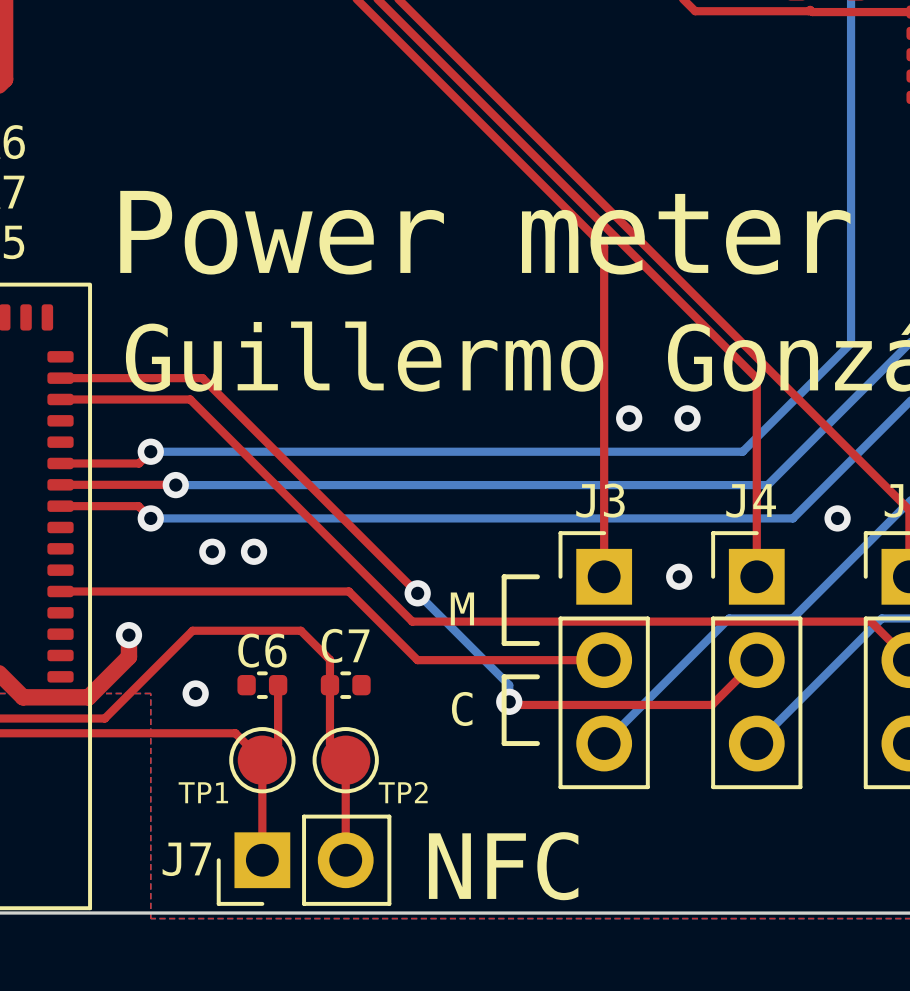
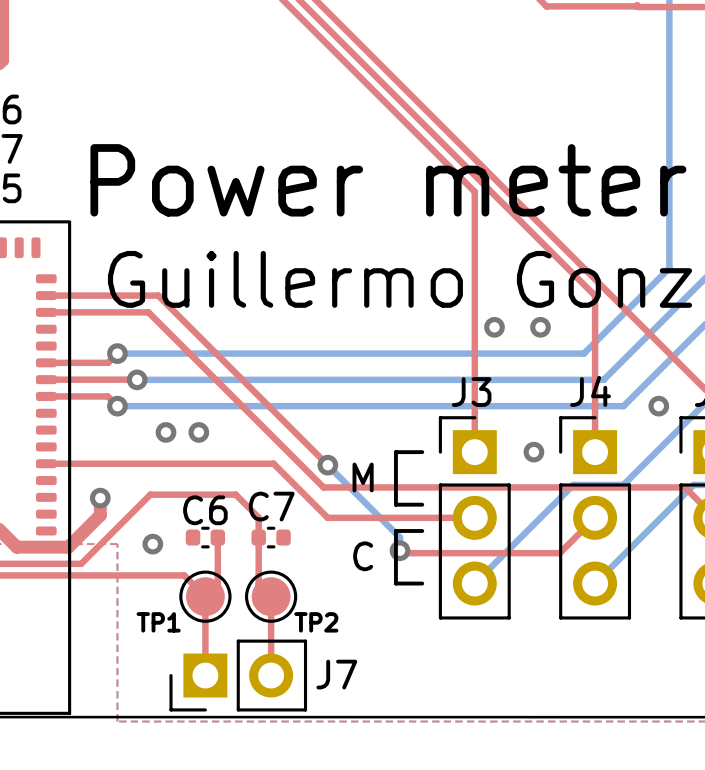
J7 name position: J7 (186, 859) -> J7 (336, 674)
text: NFC (503, 866) -> none

